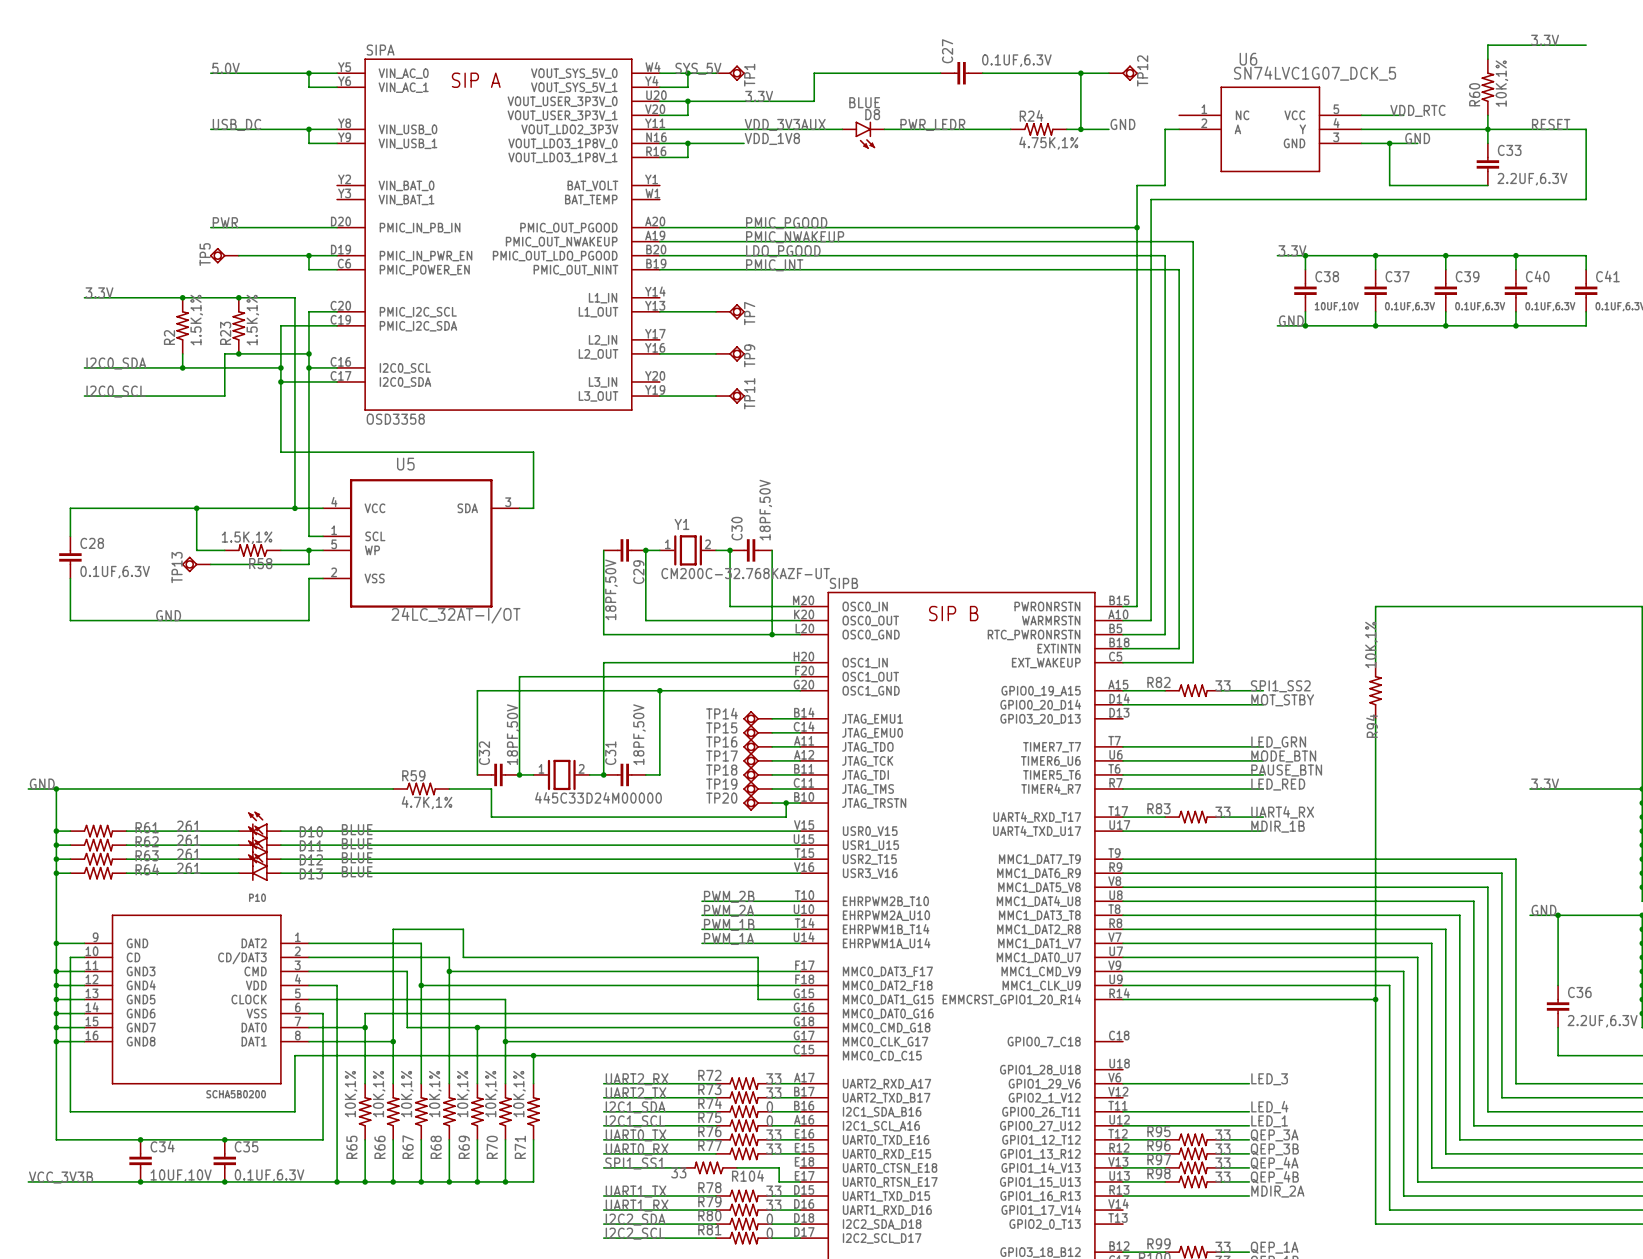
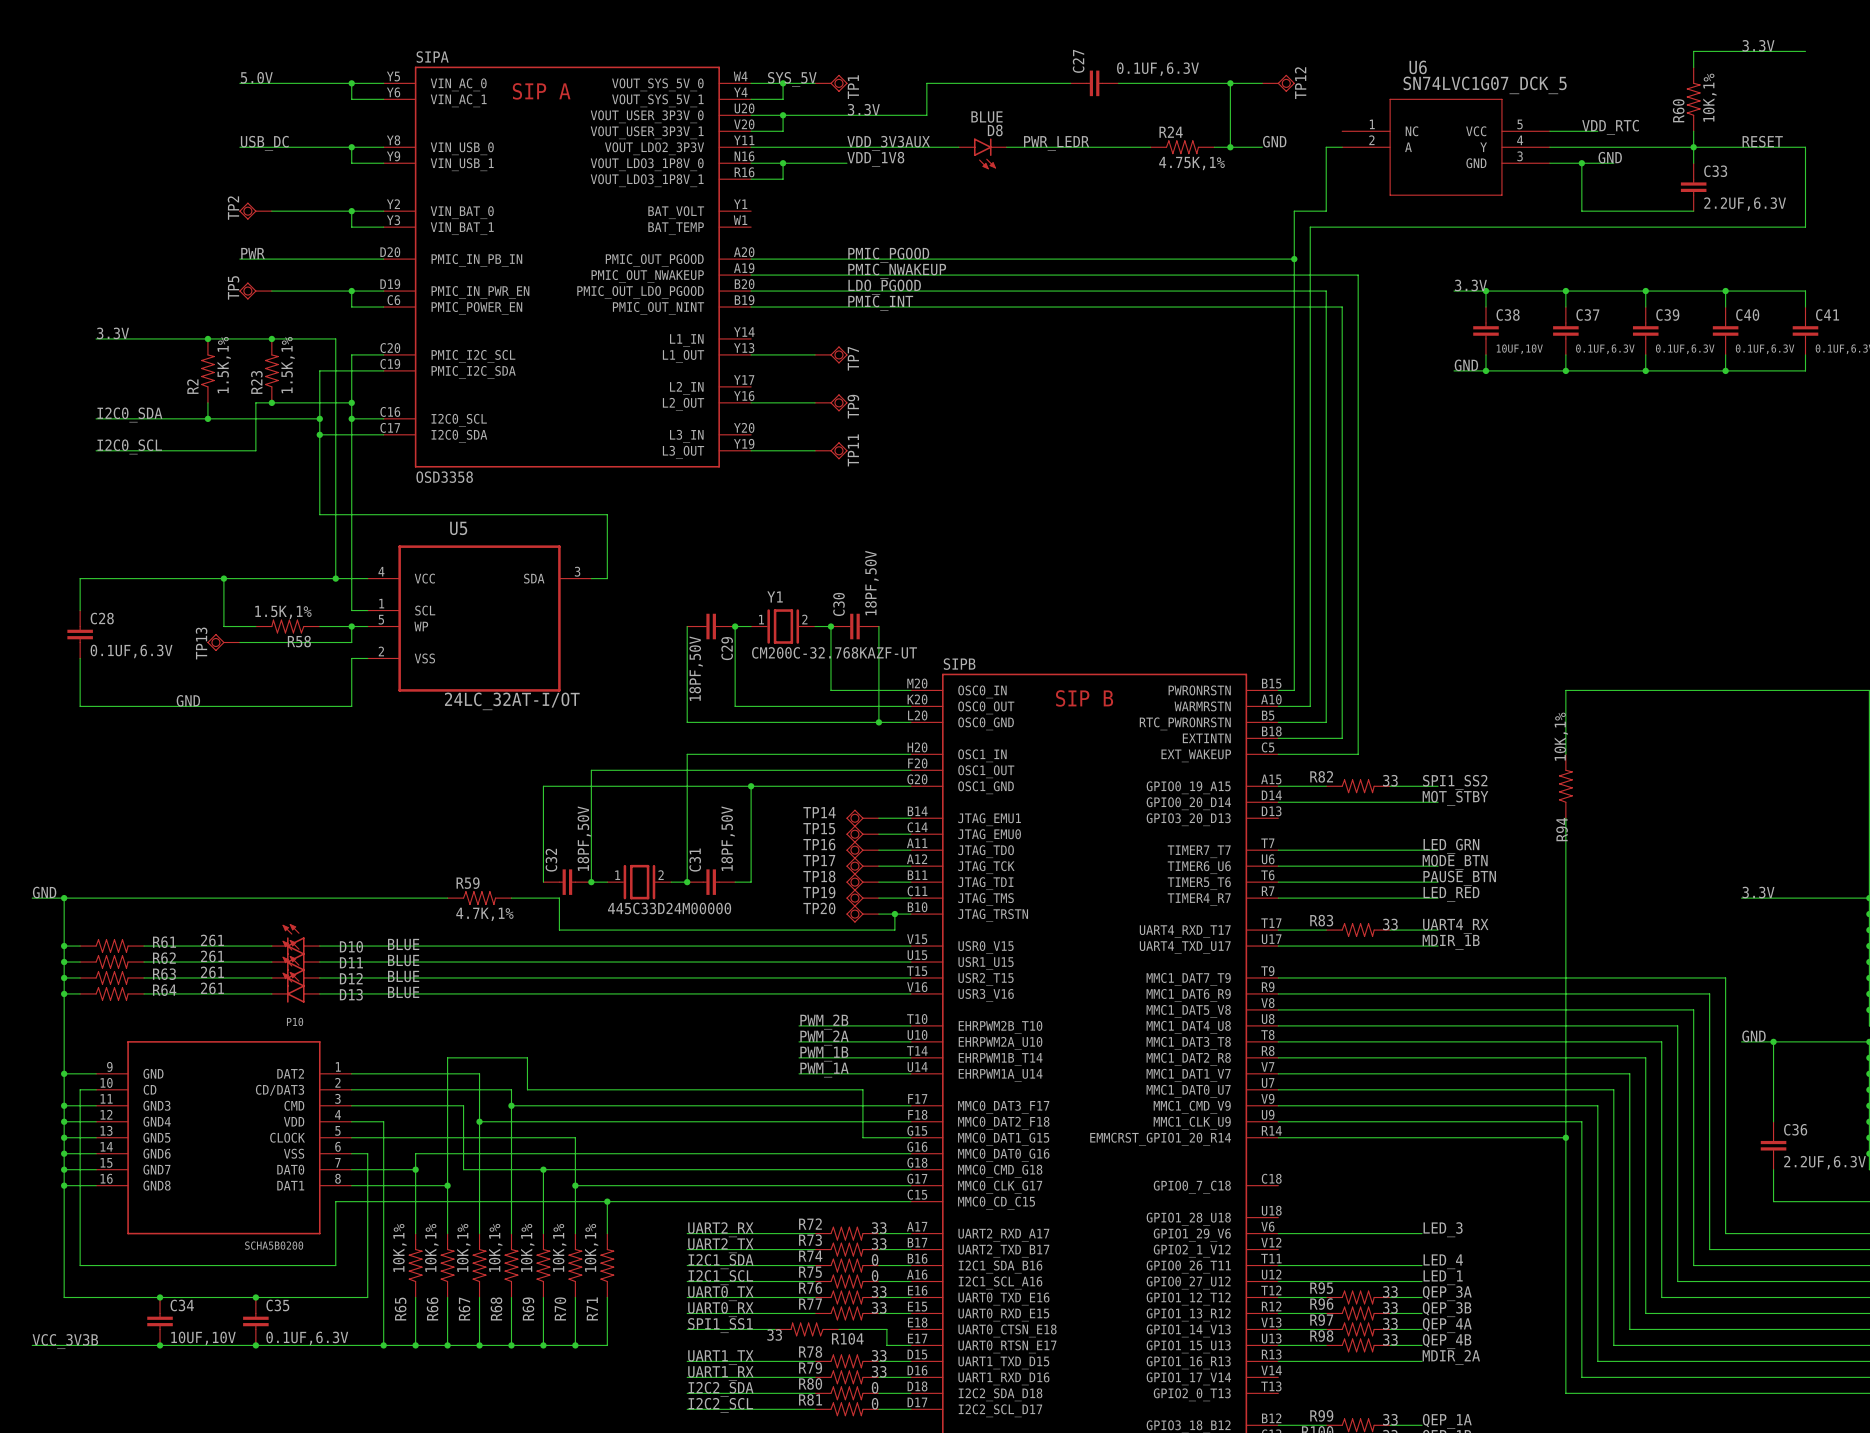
TP2: none -> (255, 211)
wire: none -> (271, 211) (383, 211)
wire: none -> (351, 211) (351, 227) (383, 227)
junction: none -> (351, 211)

